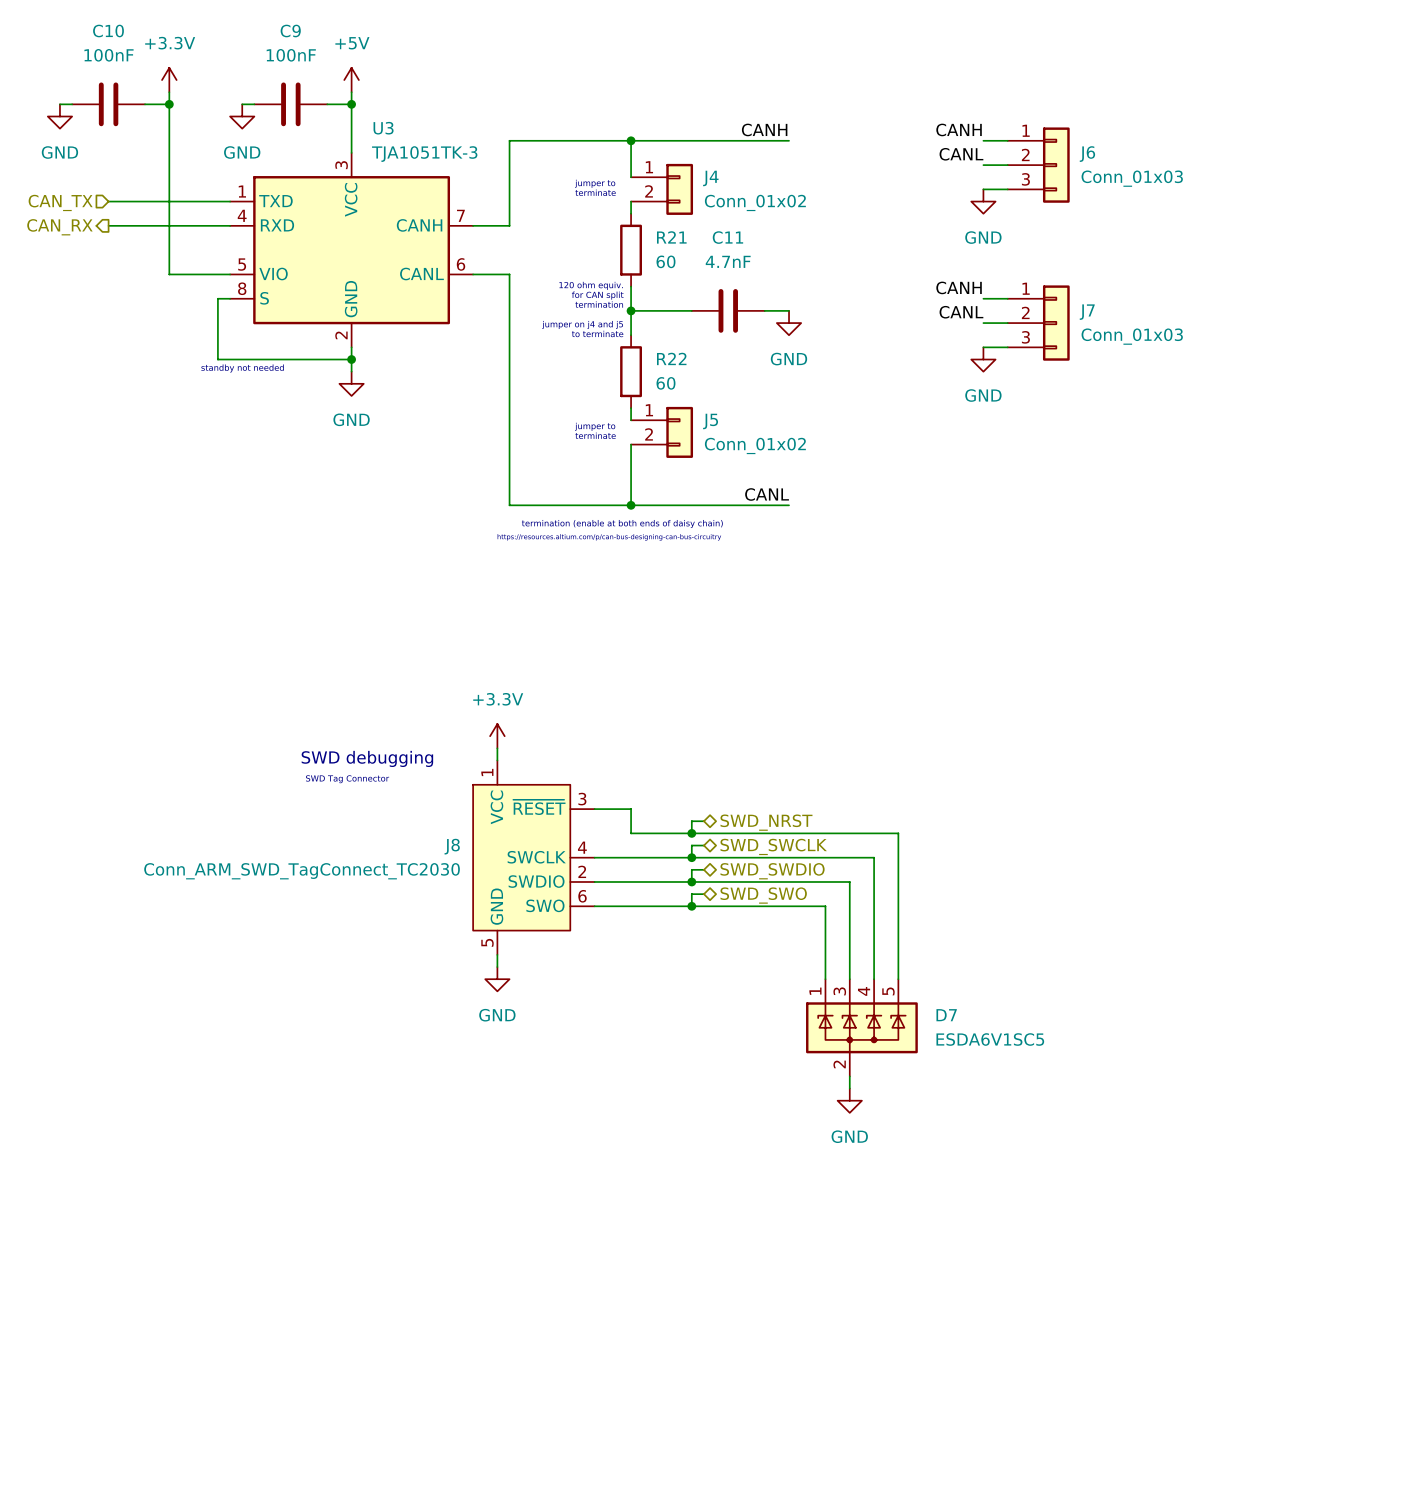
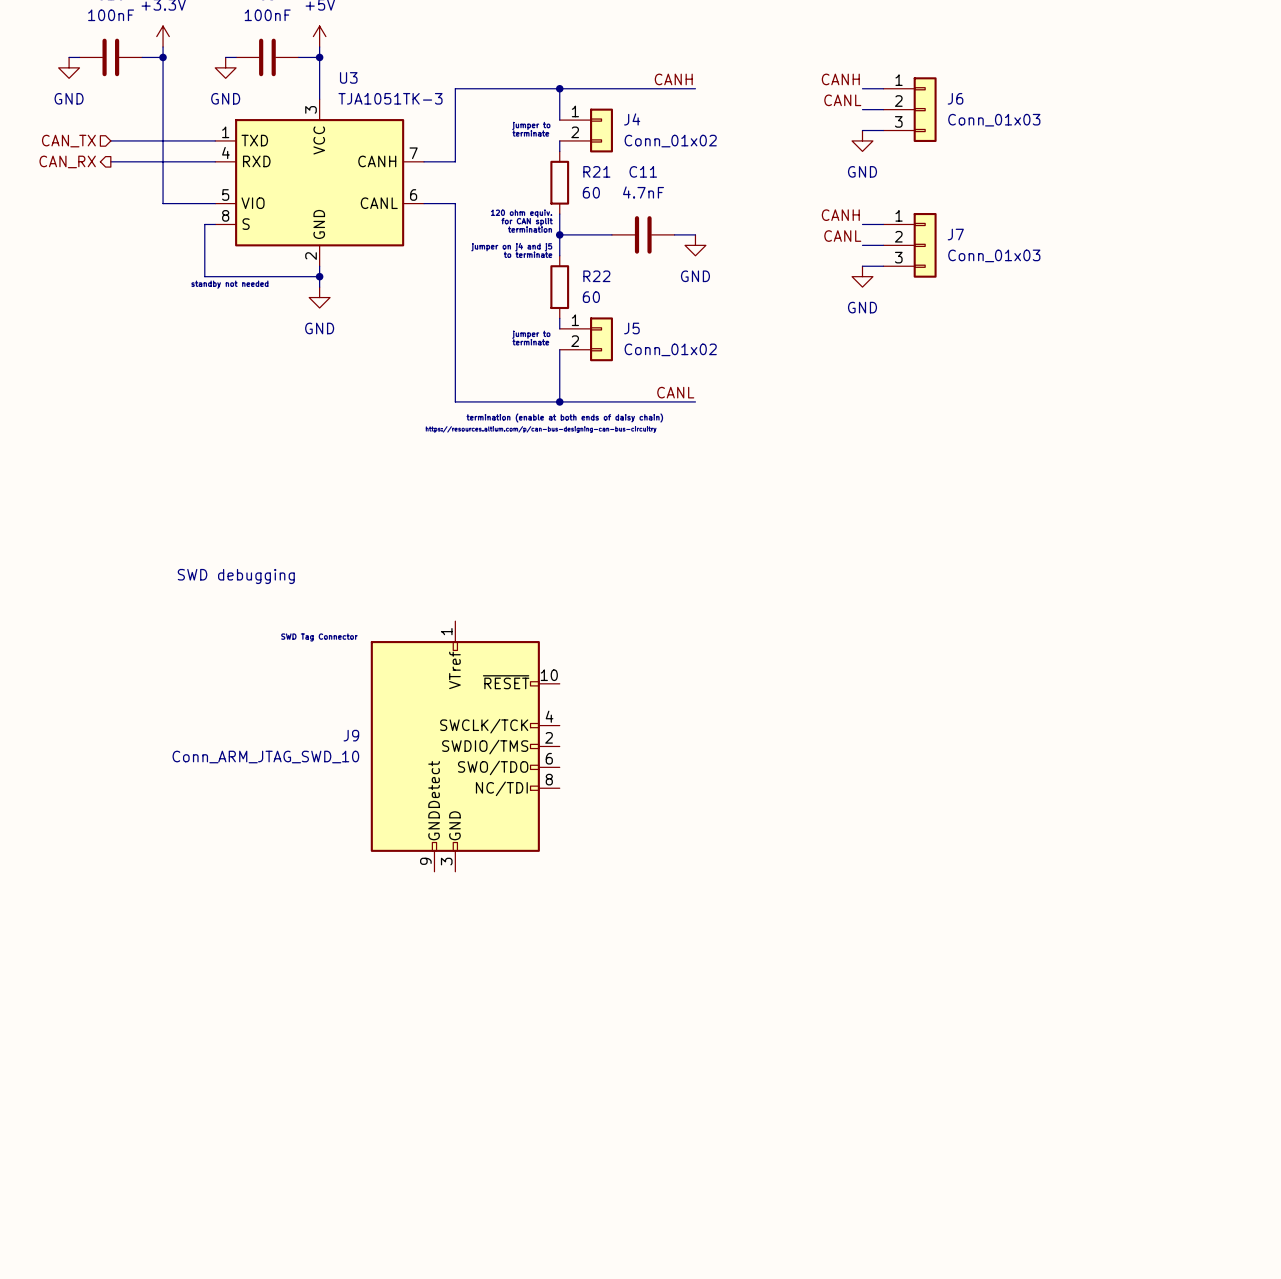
power symbol: +3.3V (497, 736) -> none
wire: (497, 748) (497, 760) -> none
text position: SWD debugging (367, 758) -> SWD debugging (236, 576)
wire: (594, 809) (631, 809) (631, 833) (898, 833) (898, 979) -> none
wire: (703, 821) (691, 821) (691, 833) -> none
hierarchical label: SWD_NRST (766, 822) -> none
junction: (691, 833) -> none
wire: (703, 845) (691, 845) (691, 857) -> none
hierarchical label: SWD_SWCLK (773, 846) -> none
J8: Conn_ARM_SWD_TagConnect_TC2030 (533, 857) -> none
wire: (594, 857) (874, 857) (874, 979) -> none
junction: (691, 857) -> none
wire: (703, 869) (691, 869) (691, 881) -> none
hierarchical label: SWD_SWDIO (772, 871) -> none
wire: (594, 881) (849, 881) (849, 979) -> none
junction: (691, 881) -> none
wire: (703, 894) (691, 894) (691, 906) -> none
hierarchical label: SWD_SWO (763, 895) -> none
J9: none -> Conn_ARM_JTAG_SWD_10 (465, 746)
wire: (594, 906) (825, 906) (825, 979) -> none
junction: (691, 906) -> none
power symbol: GND (497, 979) -> none
D7: ESDA6V1SC5 (861, 1027) -> none
wire: (849, 1076) (849, 1088) -> none
power symbol: GND (849, 1100) -> none

